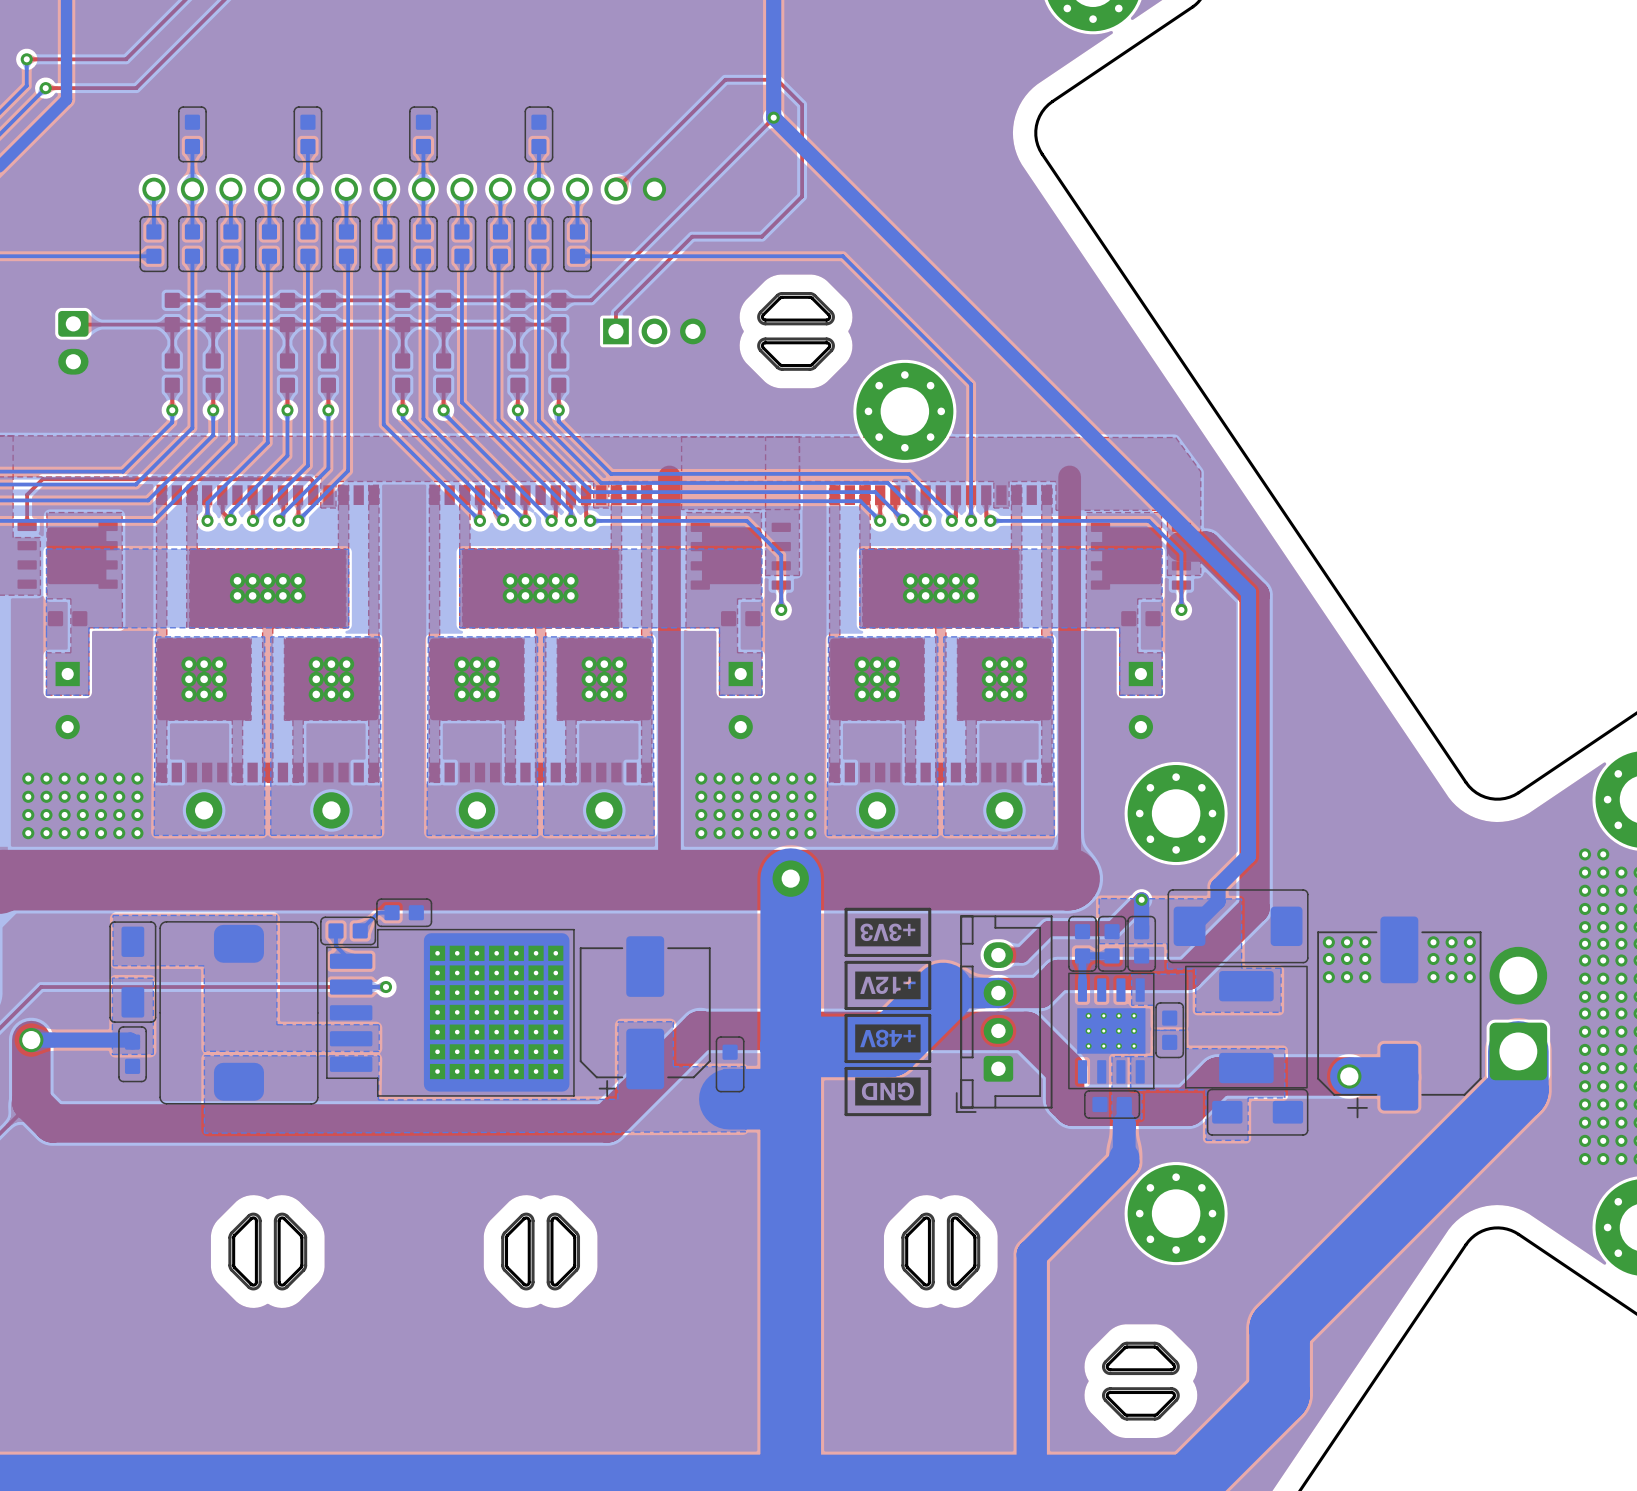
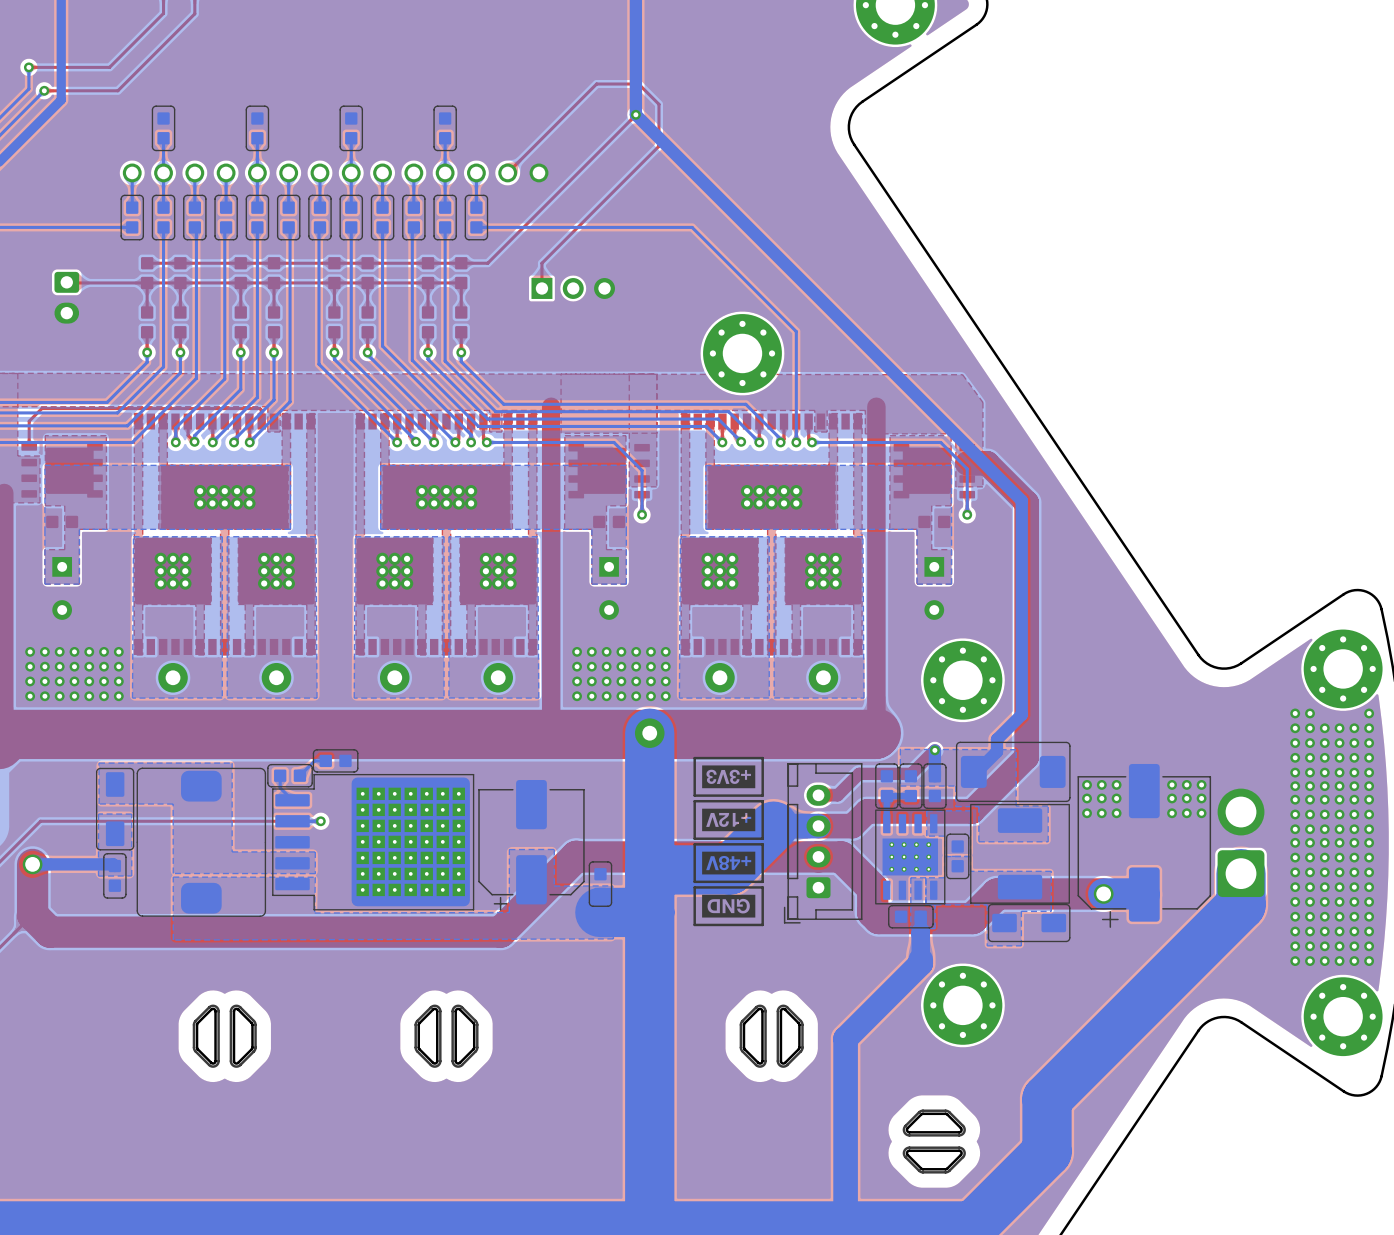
top track: (802, 156) (802, 196) (761, 236) (692, 236) (615, 312) (615, 331) -> (658, 146) (541, 263) (541, 288)
drawing: [757, 292, 835, 371] -> none
part position: (654, 331) -> (573, 288)

